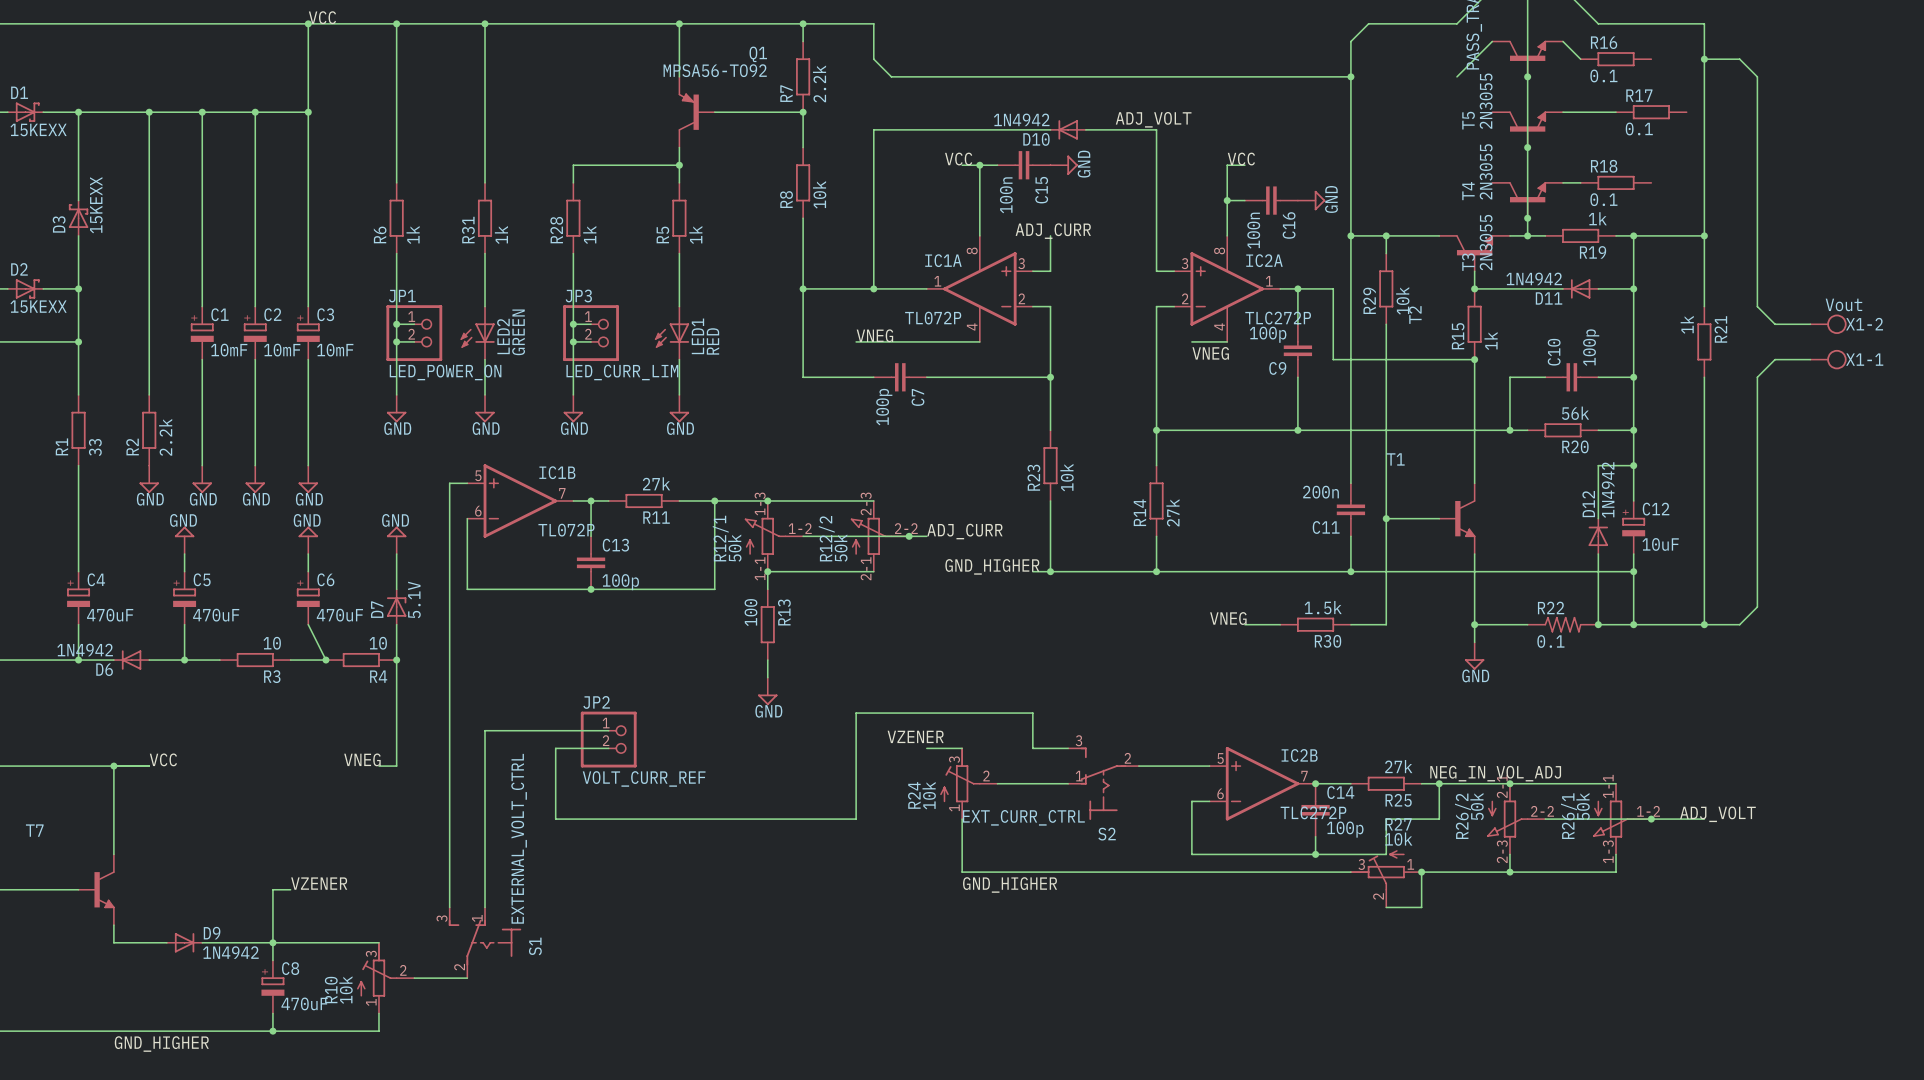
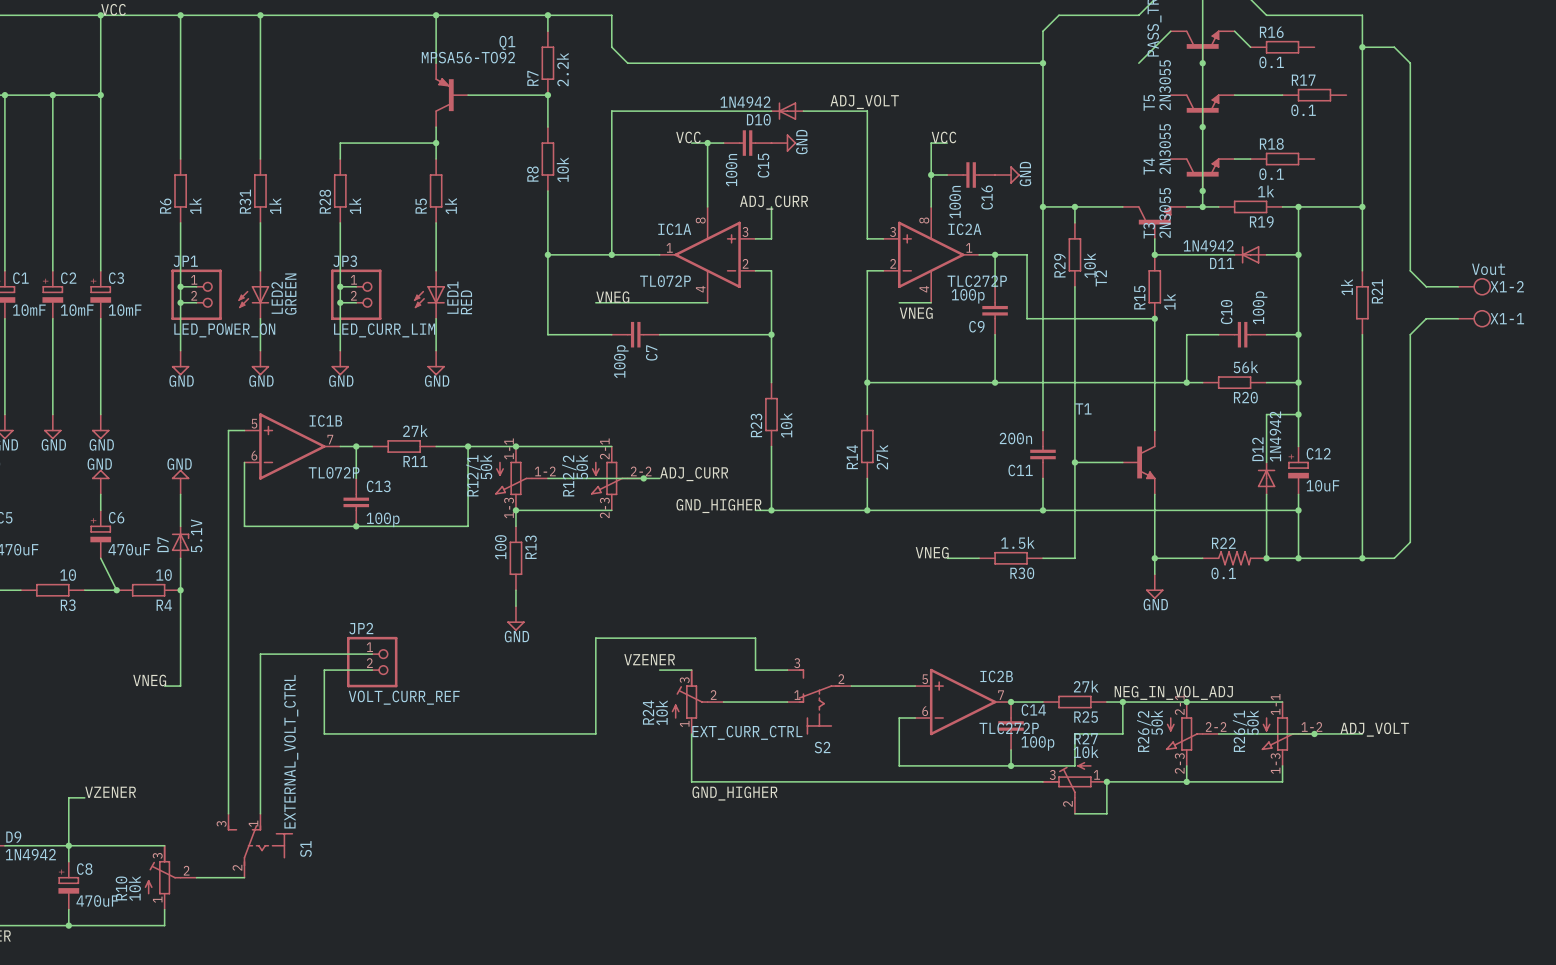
R12/1 flip: as is (765, 536) -> up-down (513, 478)
R12/2 flip: as is (871, 536) -> up-down (609, 478)

